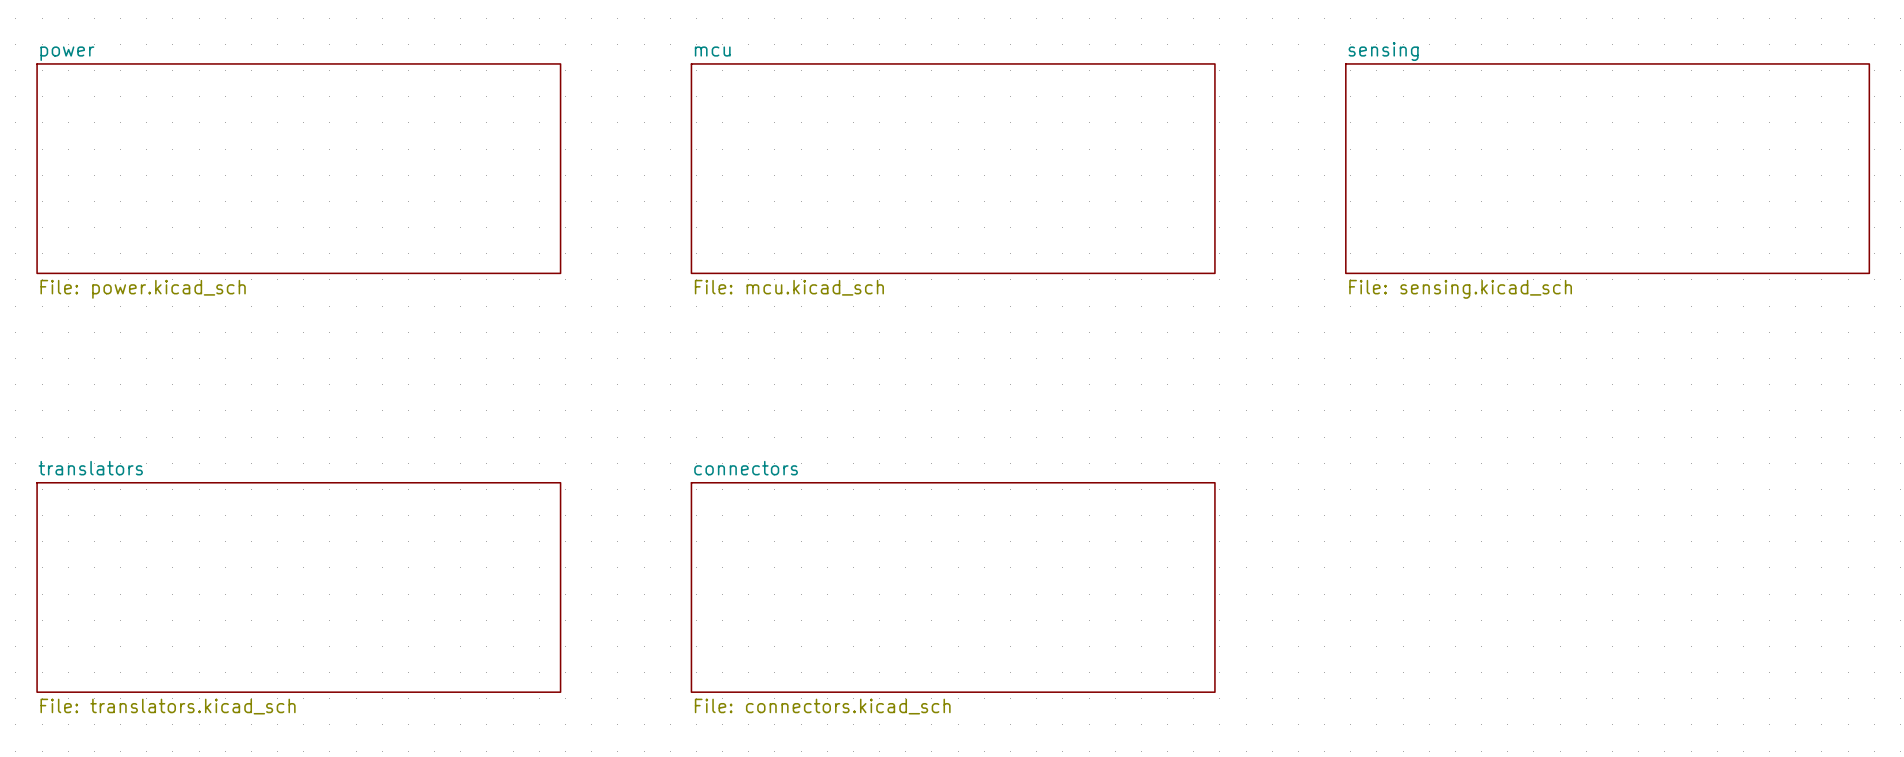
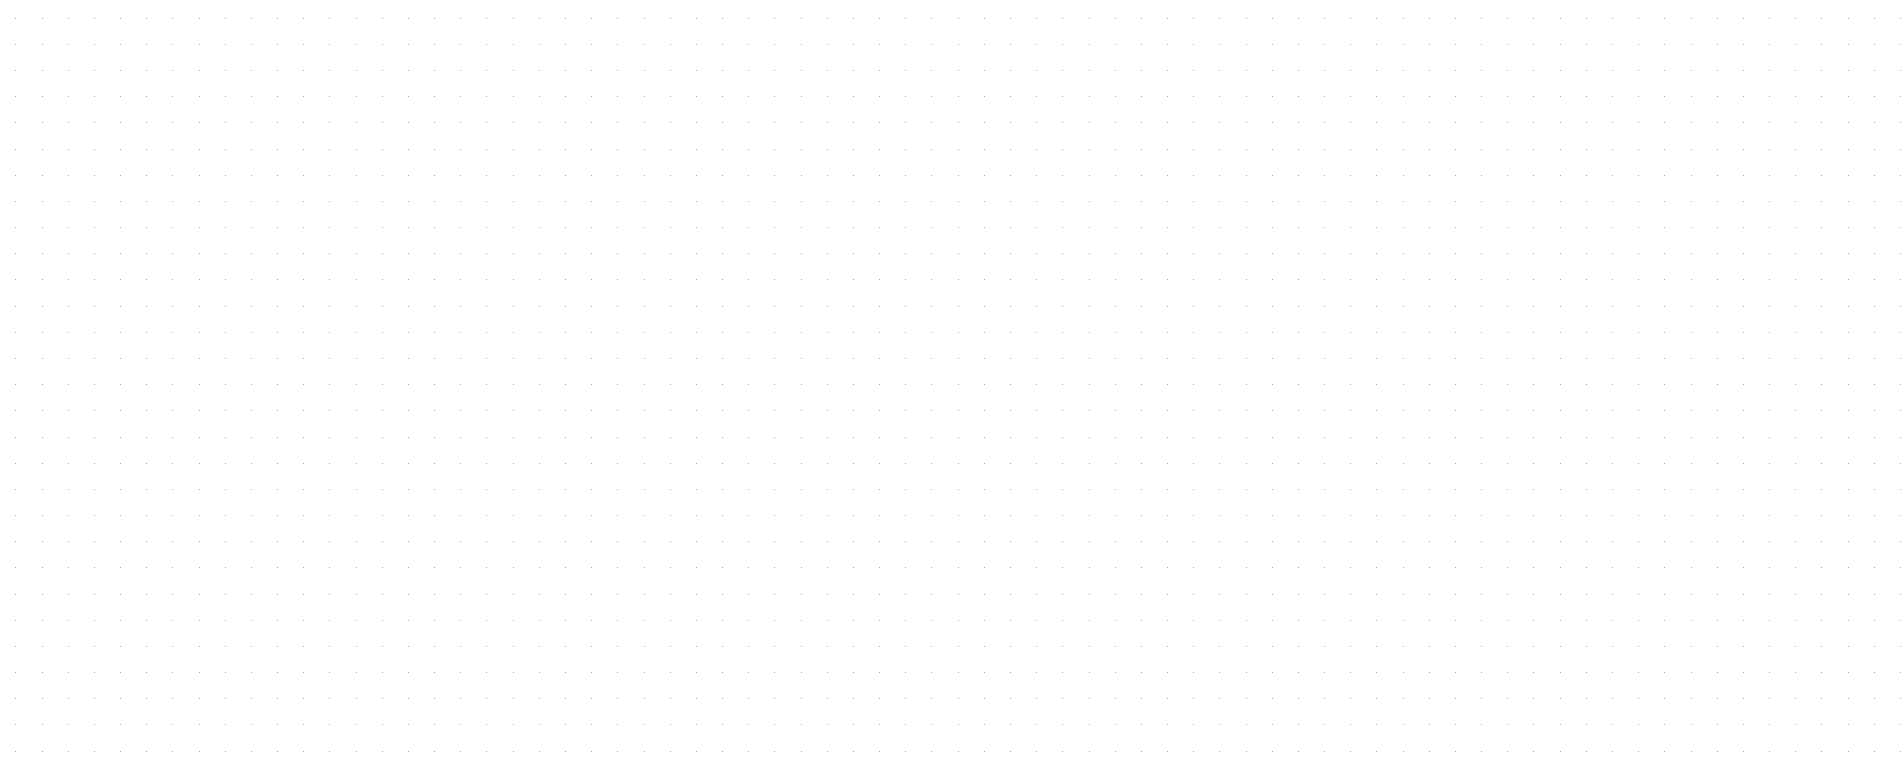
sheet power: File: power.kicad_sch (298, 168) -> none
sheet mcu: File: mcu.kicad_sch (953, 168) -> none
sheet sensing: File: sensing.kicad_sch (1607, 168) -> none
sheet translators: File: translators.kicad_sch (298, 587) -> none
sheet connectors: File: connectors.kicad_sch (953, 587) -> none

